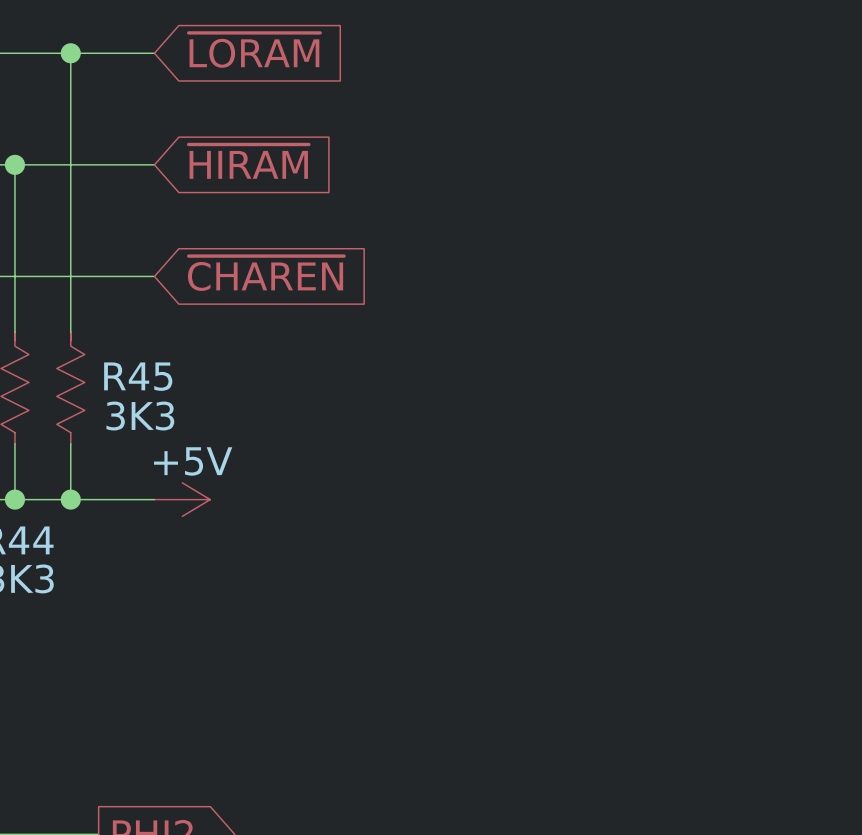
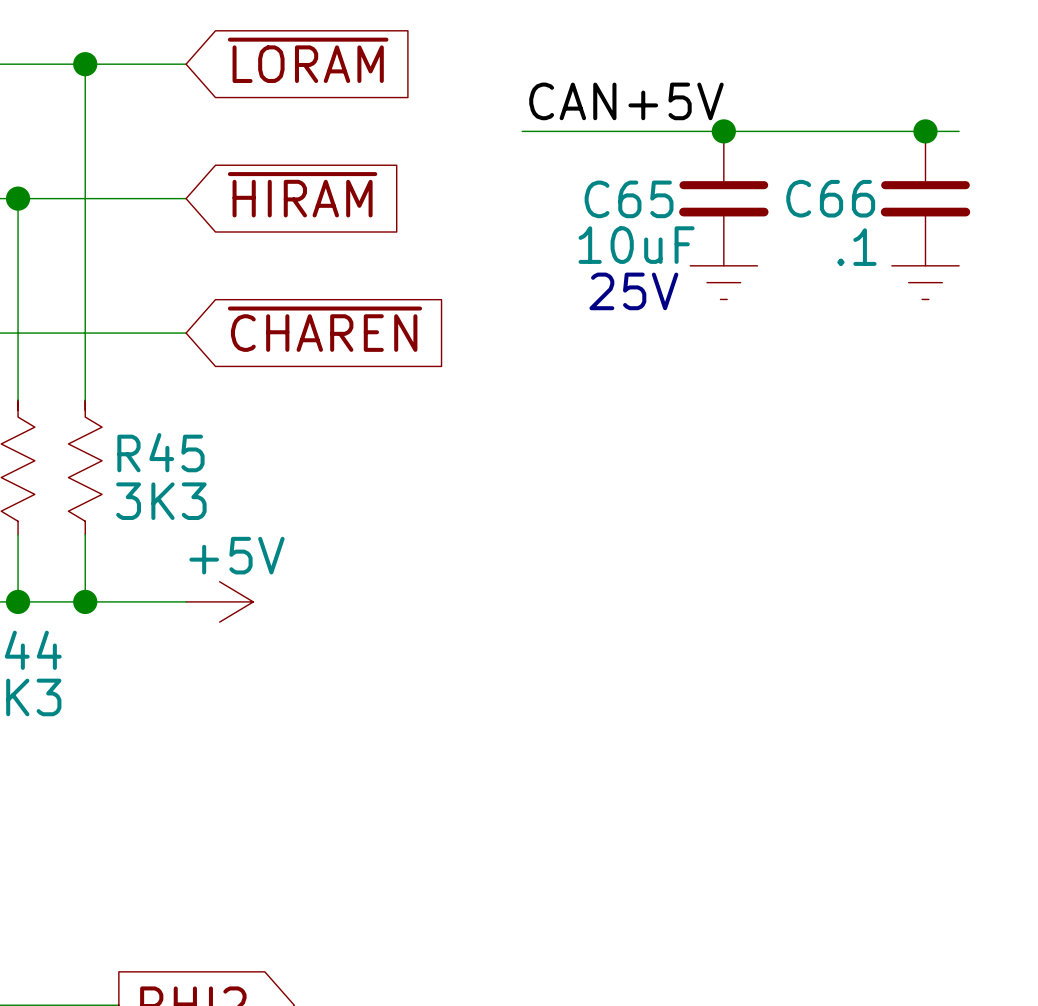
label: none -> CAN+5V (626, 101)
wire: none -> (522, 131) (959, 131)
junction: none -> (723, 131)
junction: none -> (925, 131)
C65: none -> 10uF (723, 198)
C66: none -> .1 (925, 198)
power symbol: none -> (723, 282)
power symbol: none -> (925, 282)
text: none -> 25V (633, 291)

